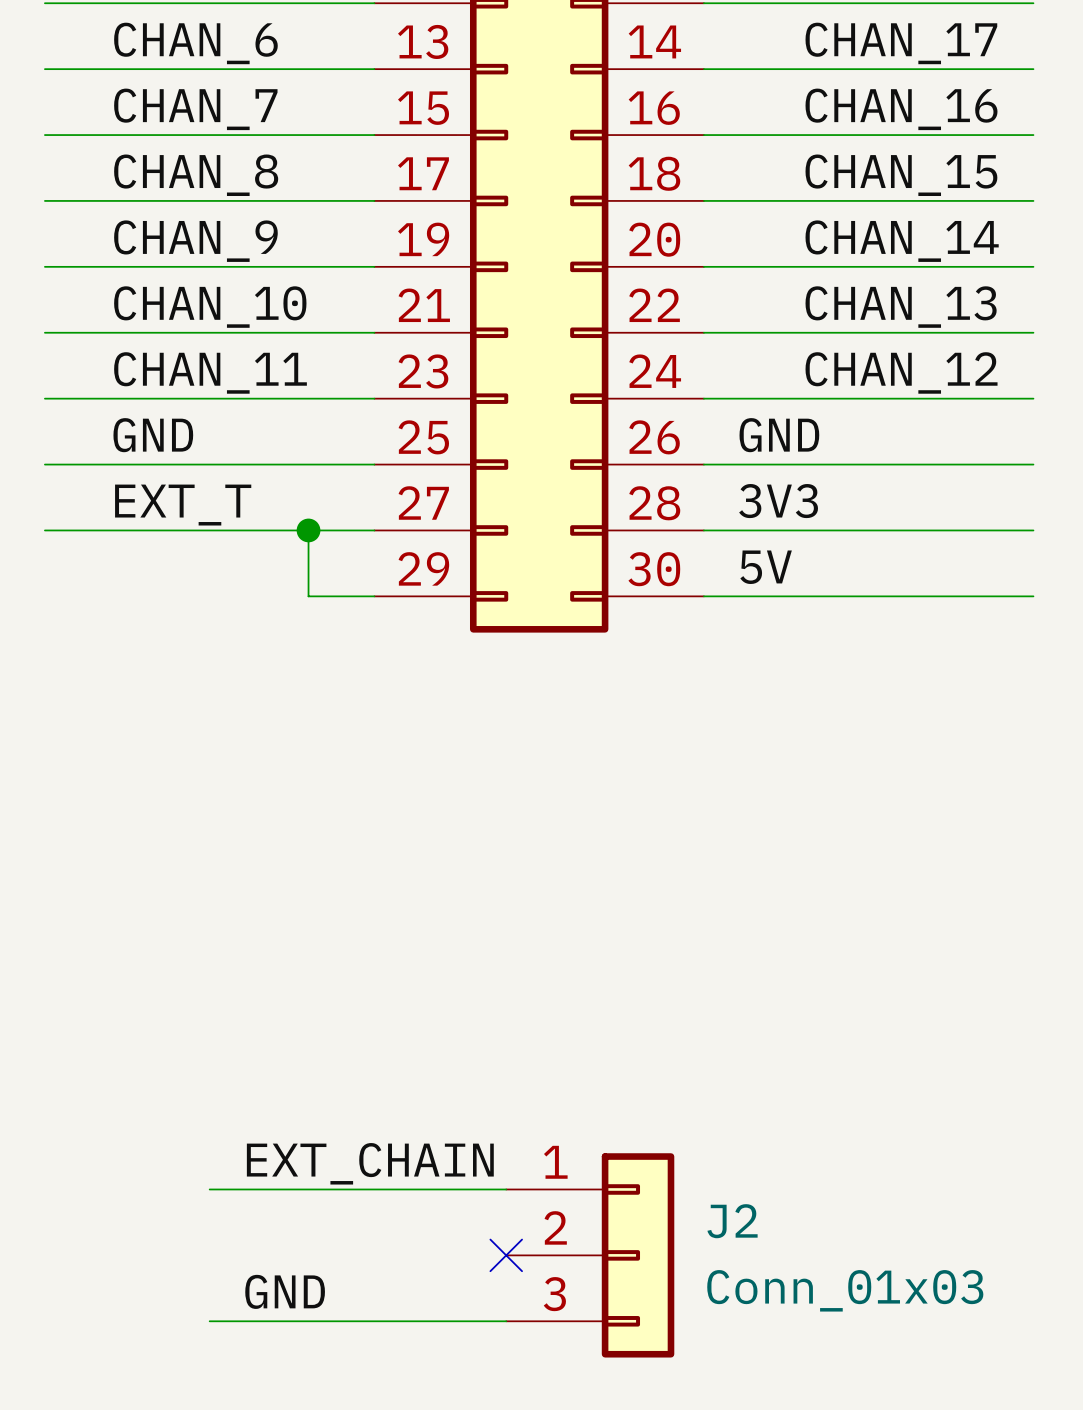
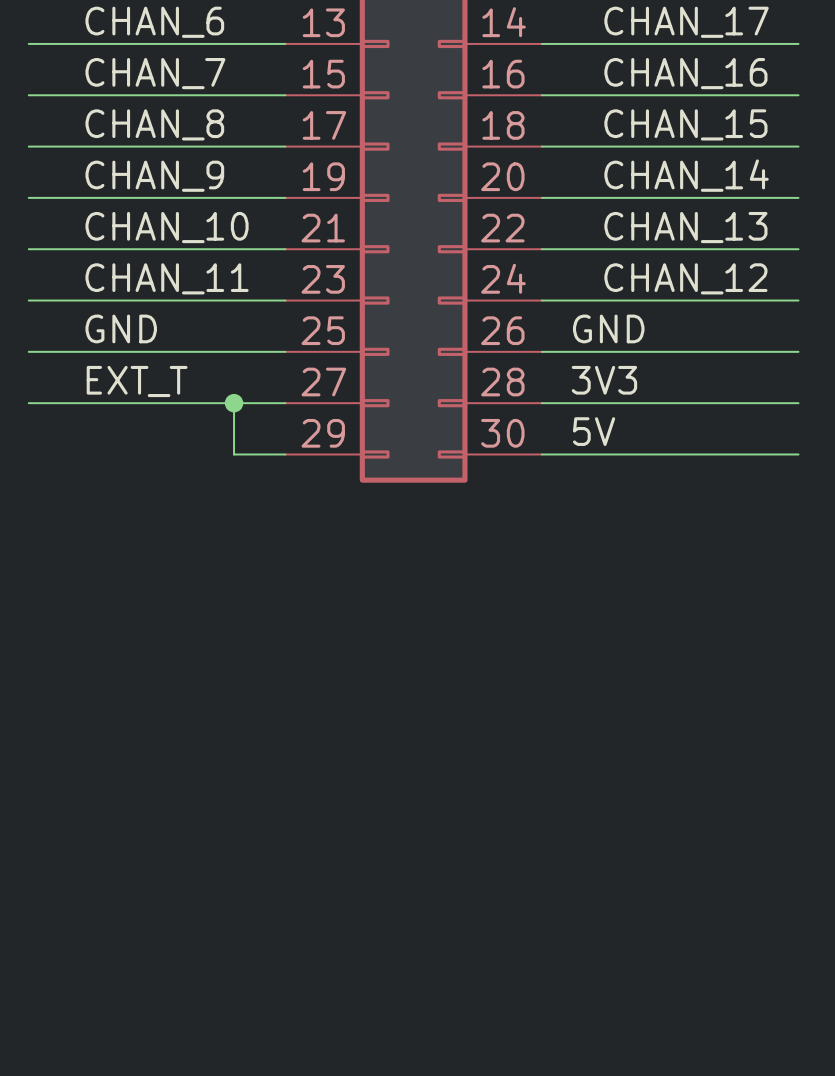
label: EXT_CHAIN (370, 1163) -> none
wire: (209, 1189) (506, 1189) -> none
no-connect mark: (506, 1255) -> none
J2: Conn_01x03 (590, 1255) -> none
label: GND (285, 1291) -> none
wire: (209, 1321) (506, 1321) -> none

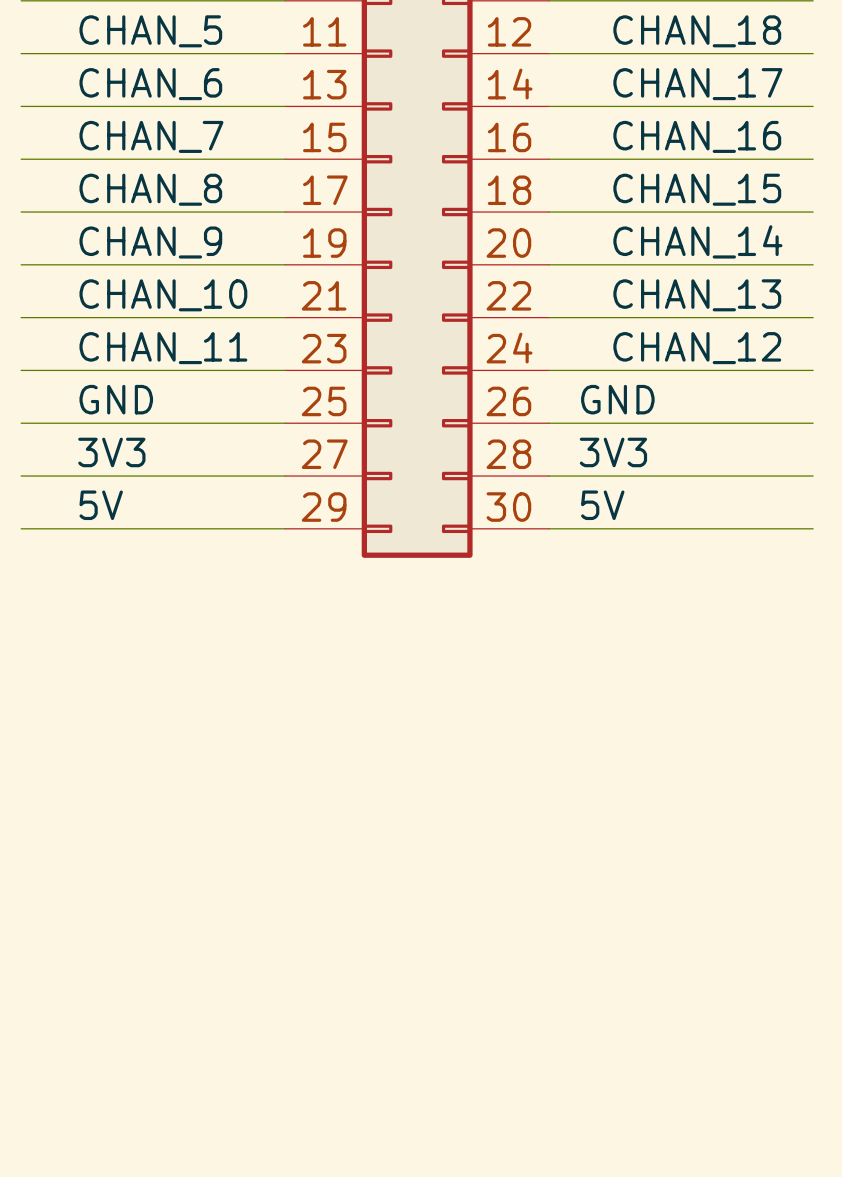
label: EXT_T (137, 381) -> 3V3 (111, 452)
wire: (234, 403) (234, 454) -> (21, 528) (232, 528)
junction: (234, 403) -> none
label: none -> 5V (101, 505)

